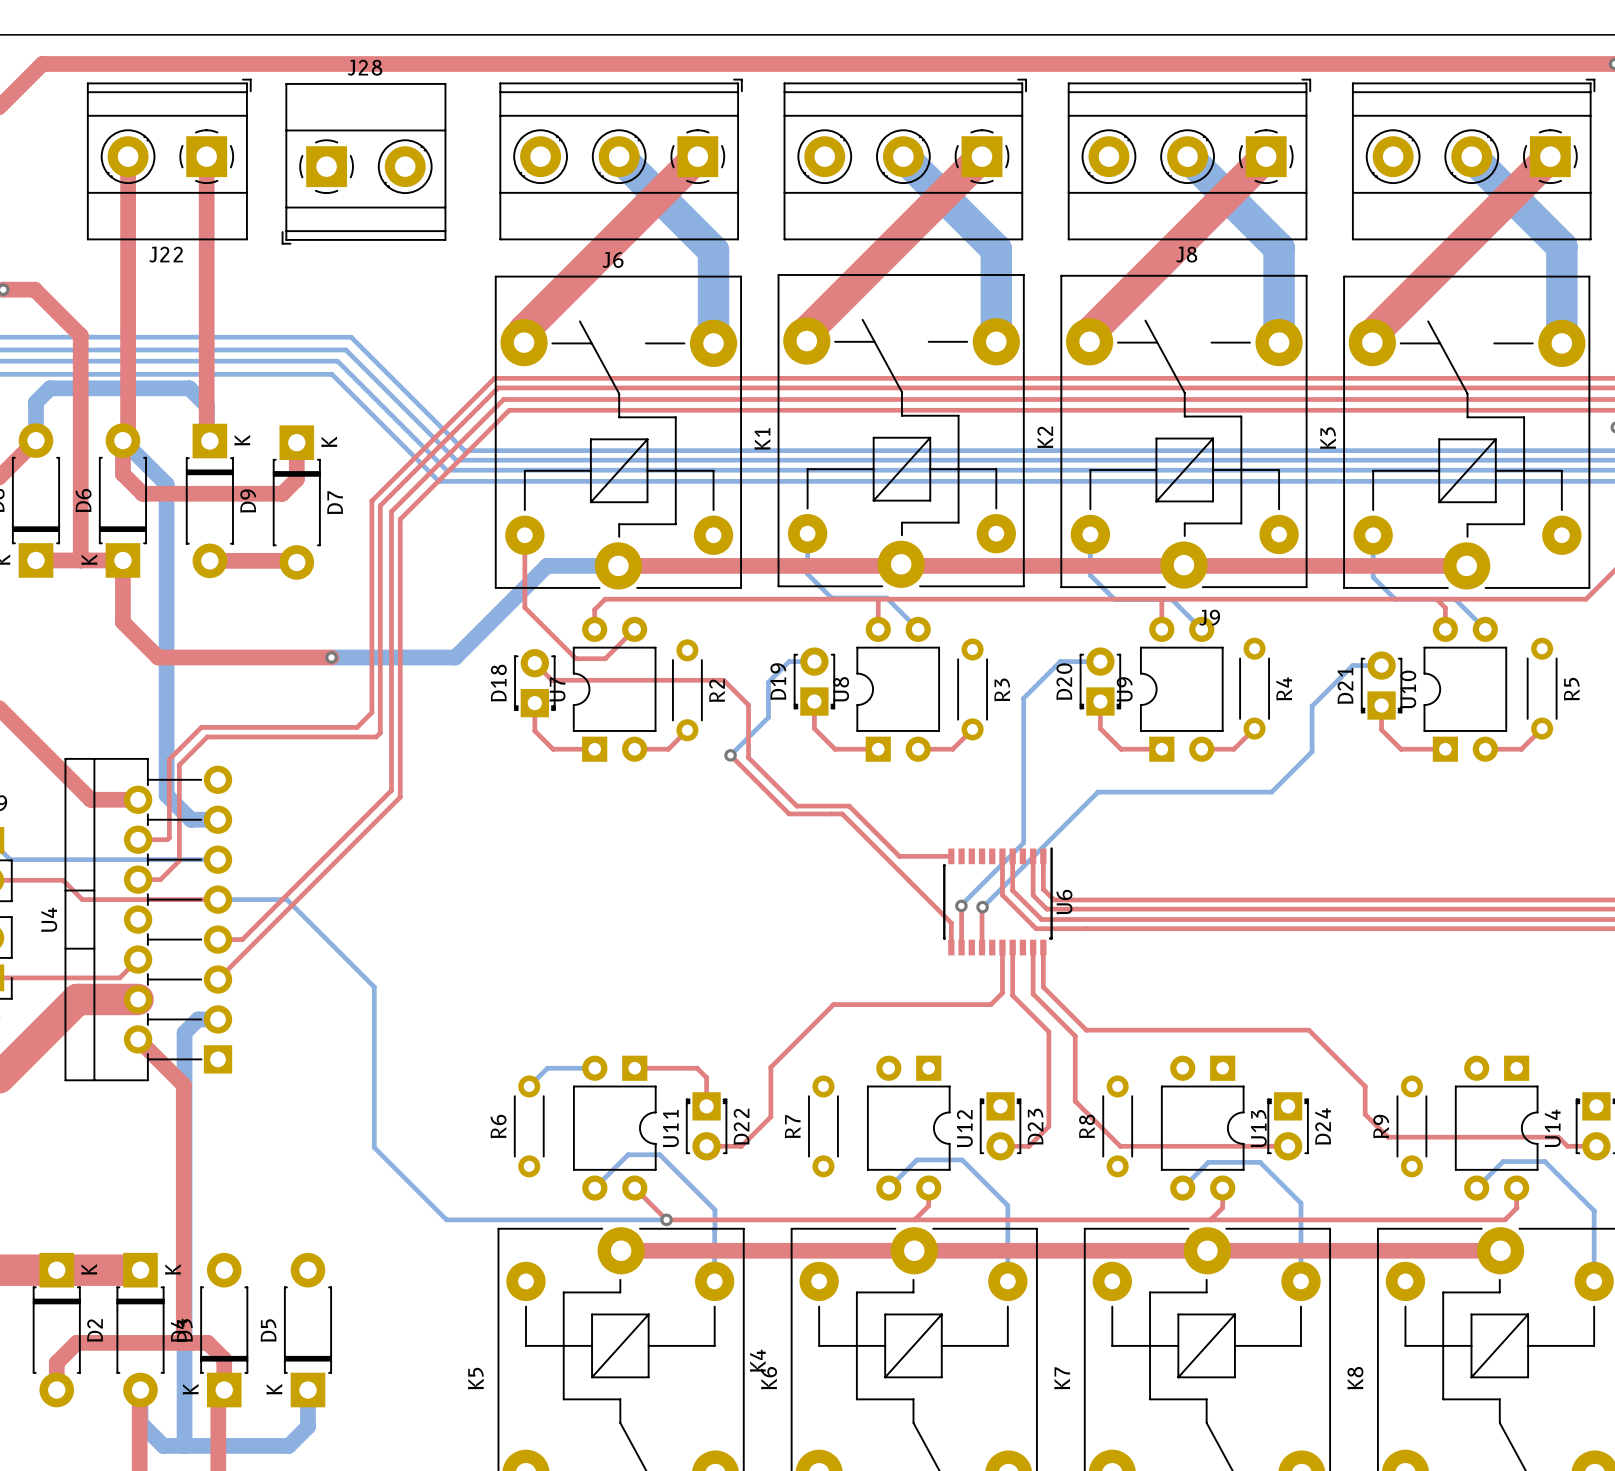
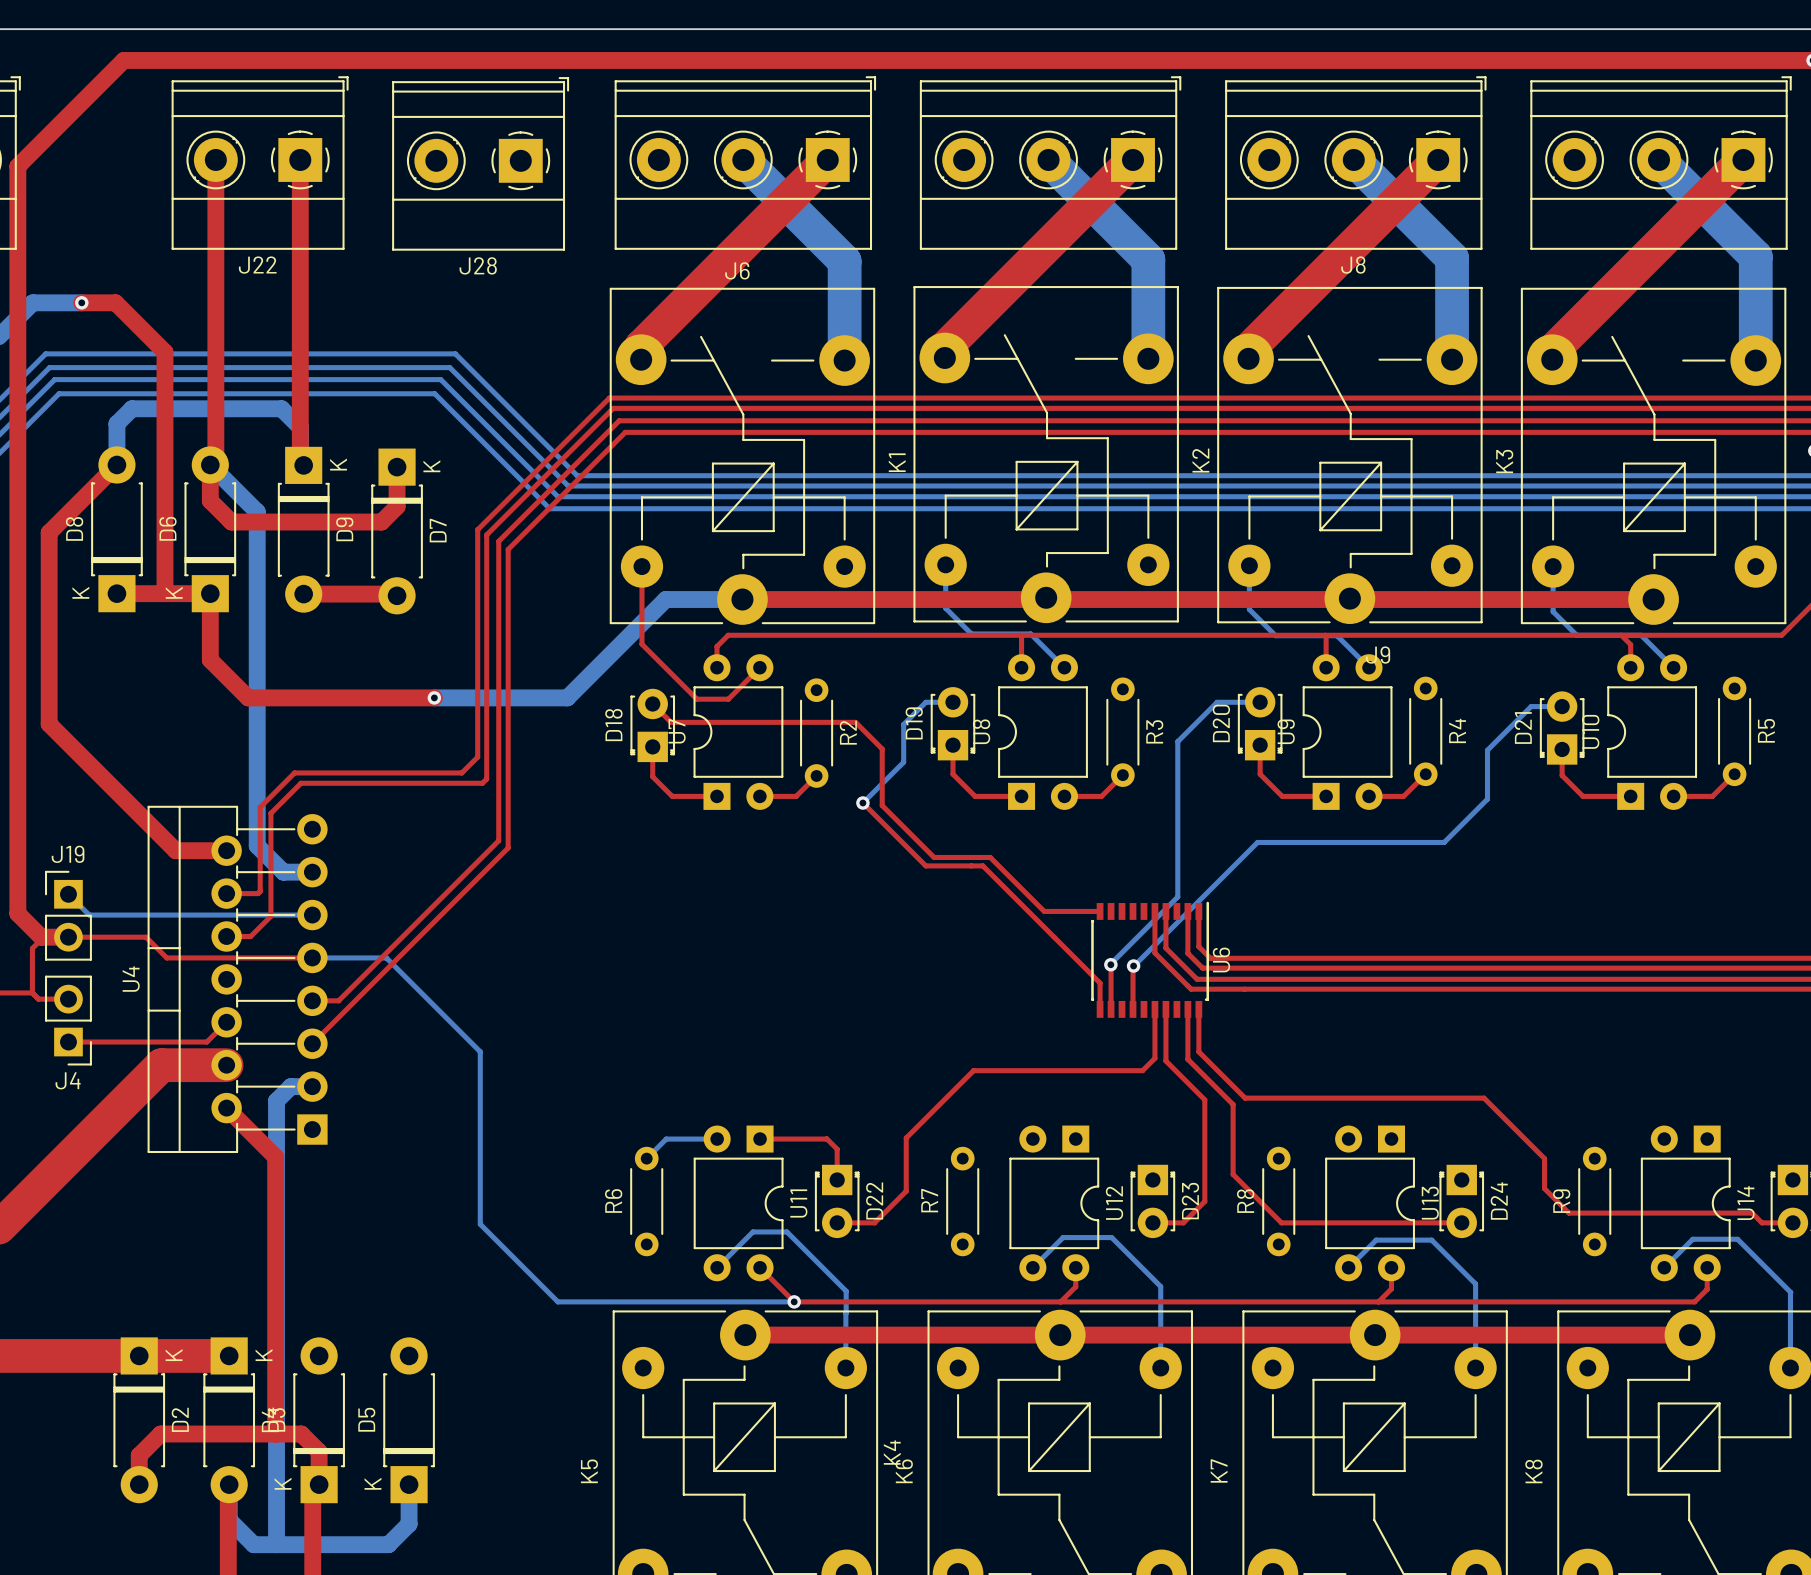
J28 rotation: 0° (364, 163) -> 180° (480, 163)

